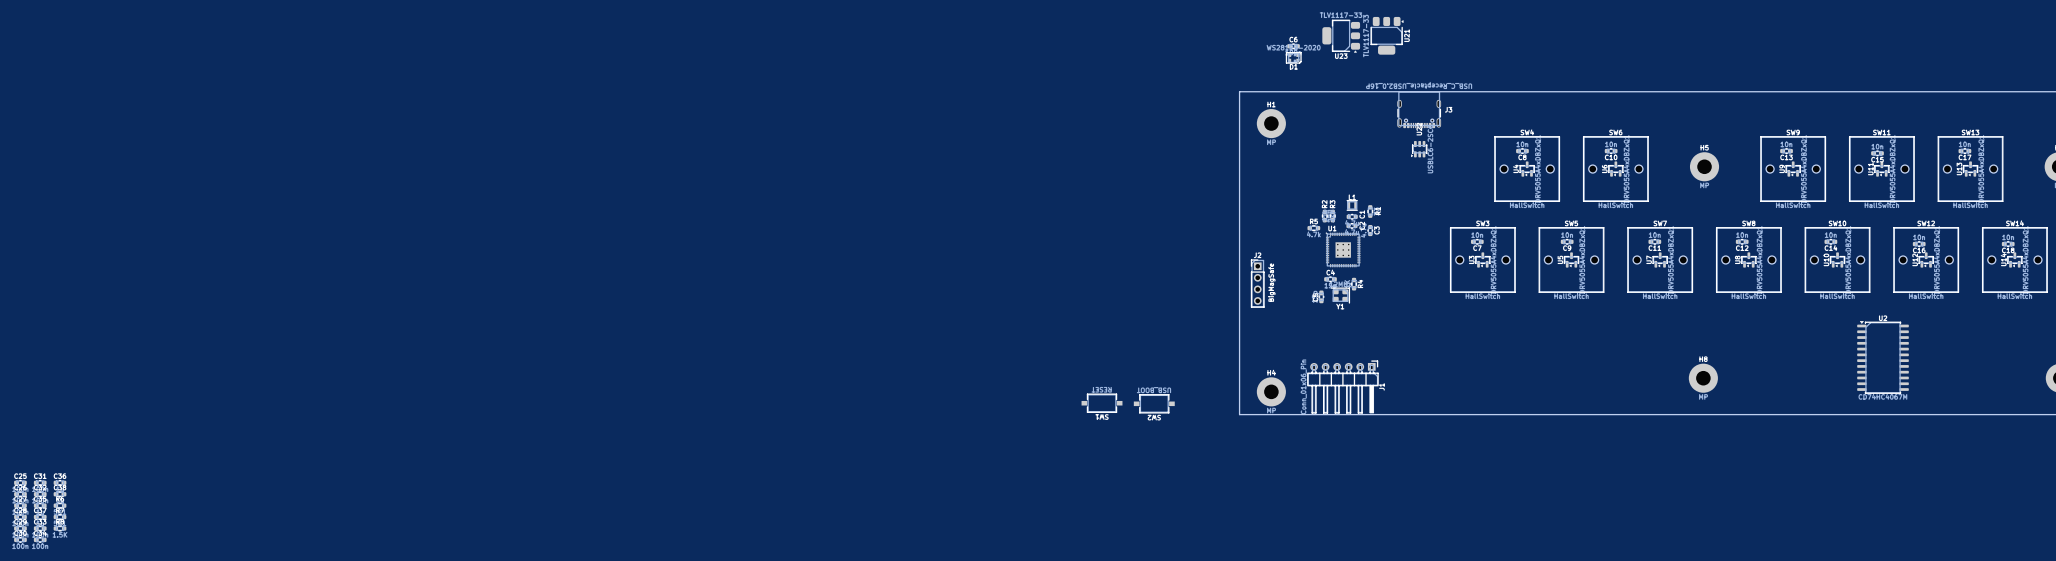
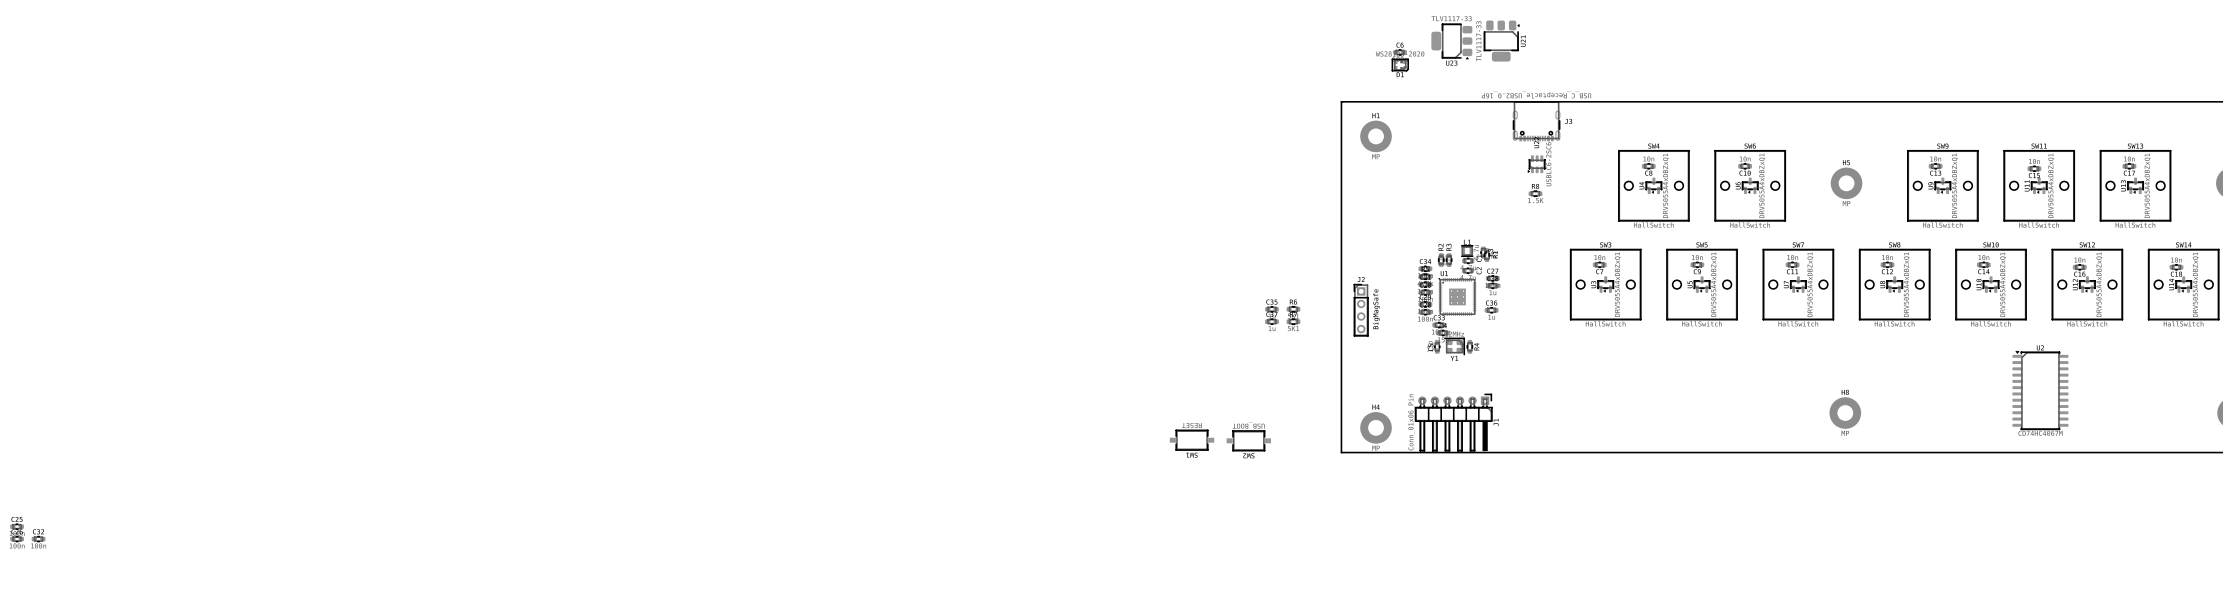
part position: (1352, 205) -> (1467, 251)
part position: (1370, 211) -> (1486, 255)
part position: (1324, 216) -> (1441, 260)
part position: (1332, 216) -> (1449, 260)
part position: (1352, 216) -> (1468, 260)
part position: (1351, 225) -> (1468, 270)
part position: (1313, 228) -> (1425, 276)
part position: (1343, 249) -> (1457, 296)
part position: (1330, 279) -> (1443, 333)
part position: (1354, 284) -> (1469, 346)
part position: (1340, 295) -> (1454, 346)
part position: (1321, 296) -> (1437, 346)
part position: (40, 482) -> (1425, 284)
part position: (60, 482) -> (1491, 310)
part position: (60, 494) -> (1492, 285)
part position: (20, 505) -> (1492, 278)
part position: (40, 505) -> (1271, 309)
part position: (60, 505) -> (1293, 309)
part position: (20, 517) -> (1425, 312)
part position: (40, 517) -> (1271, 321)
part position: (60, 517) -> (1293, 321)
part position: (20, 528) -> (1425, 304)
part position: (40, 528) -> (1439, 325)
part position: (60, 528) -> (1535, 193)
part position: (20, 539) -> (1425, 292)
part position: (40, 539) -> (1425, 268)

